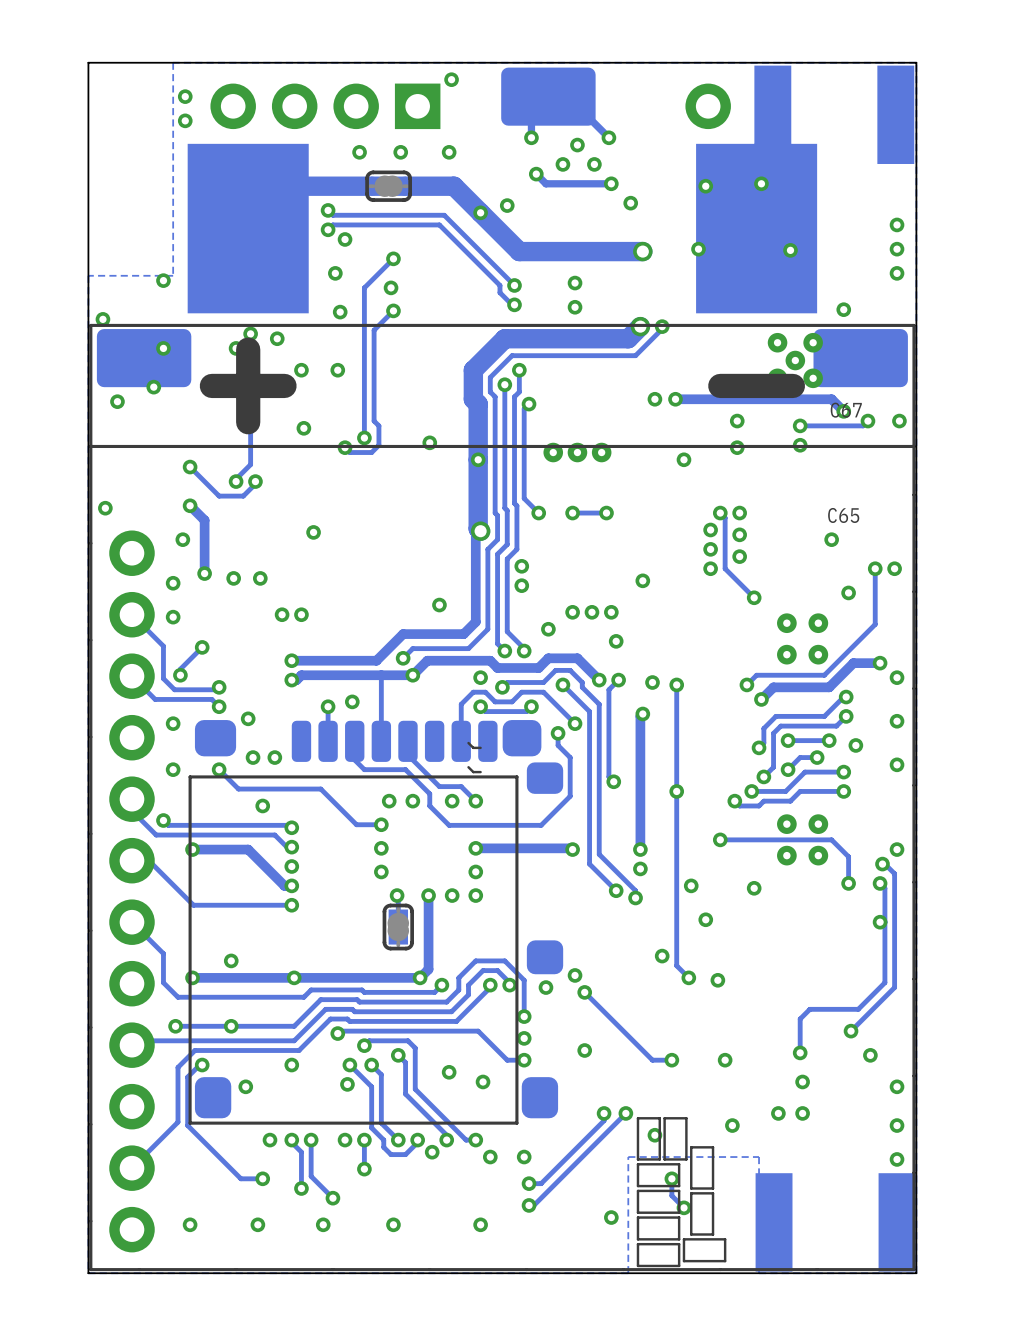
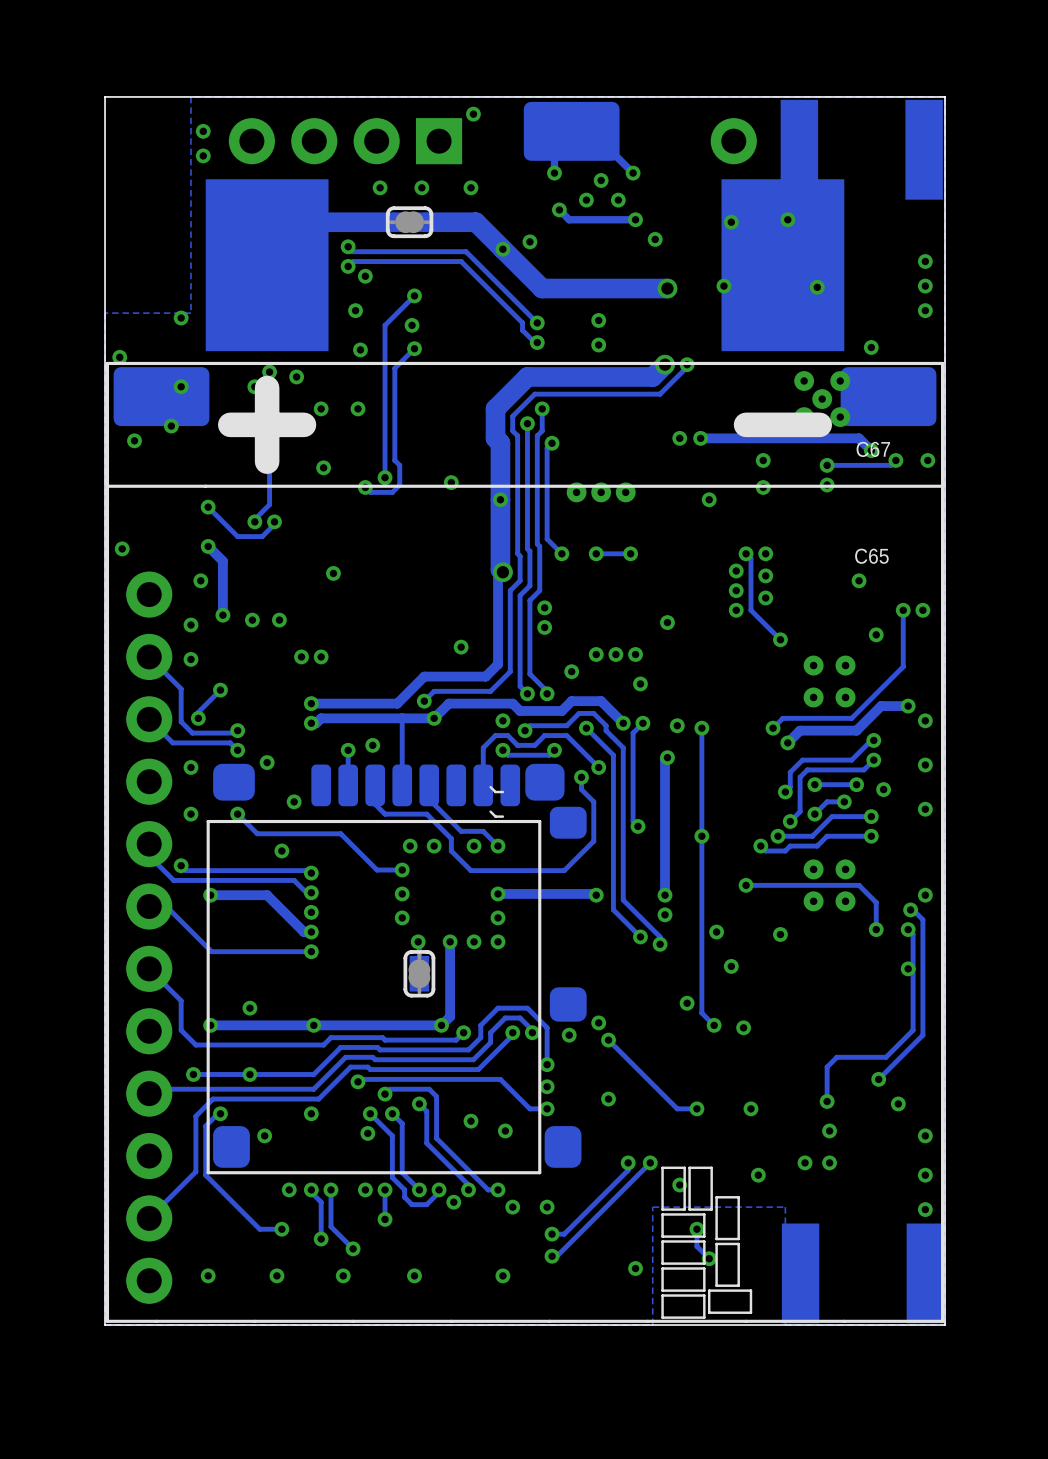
via: (253, 757) -> none

